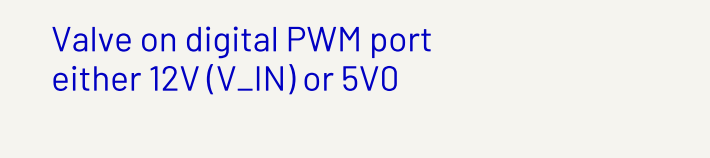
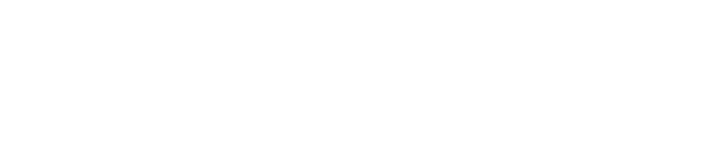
text: Valve on digital PWM port (241, 42) -> none
text: either 12V (V_IN) or 5V0 (225, 79) -> none

